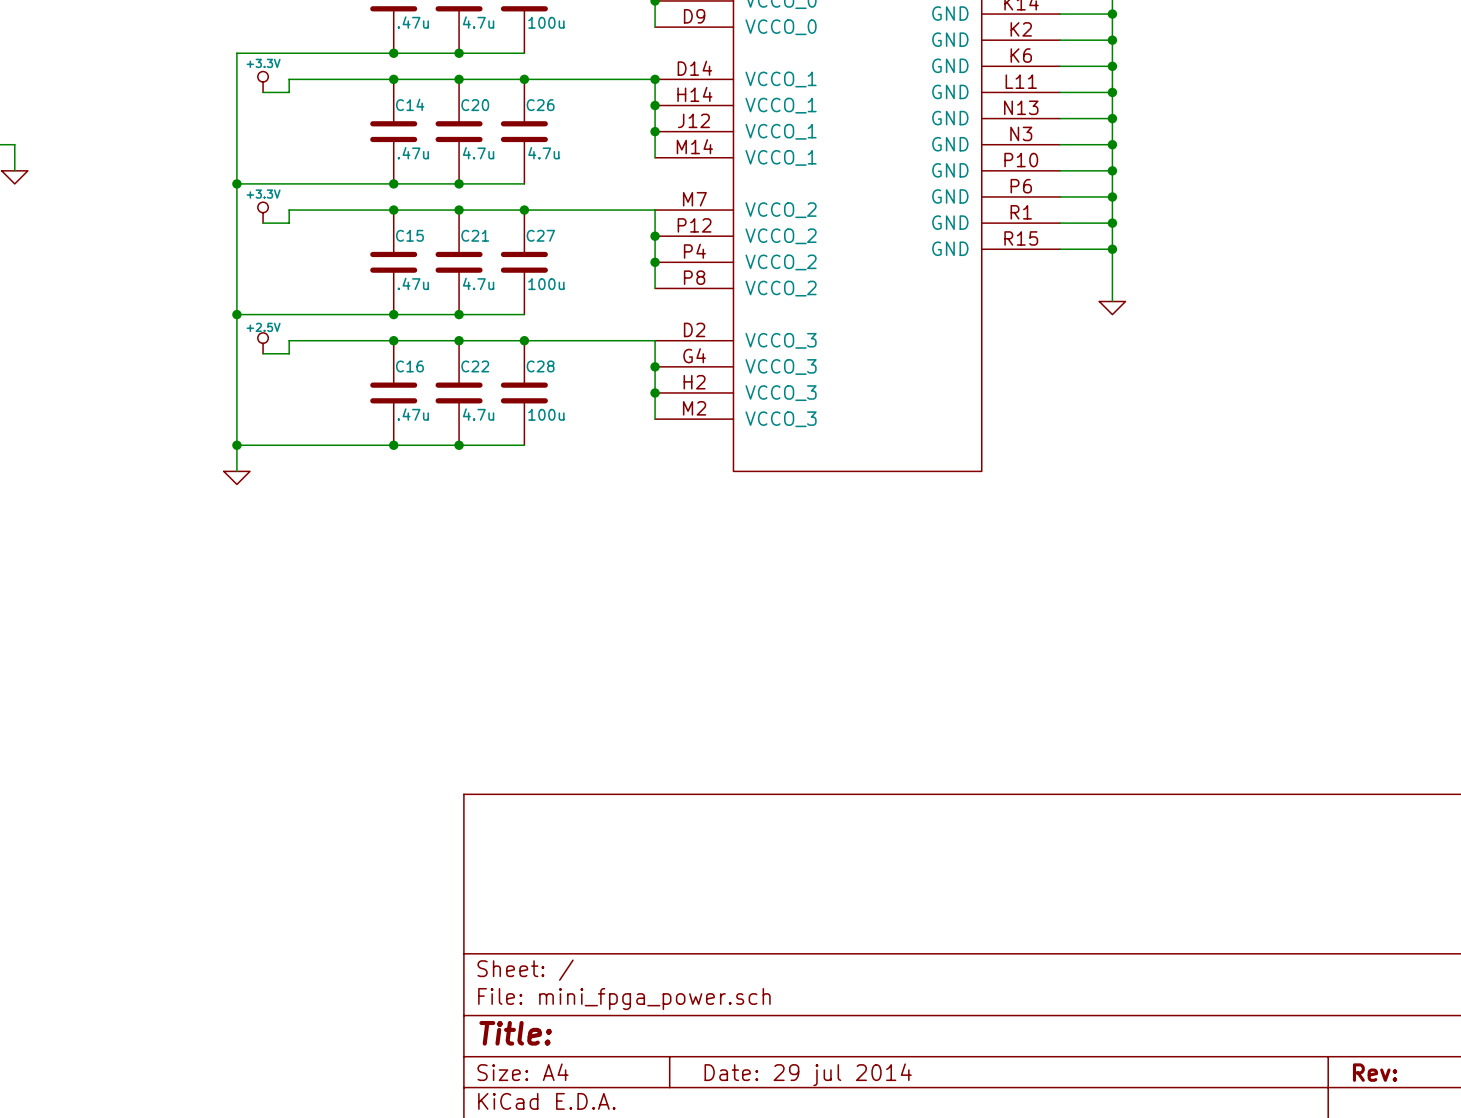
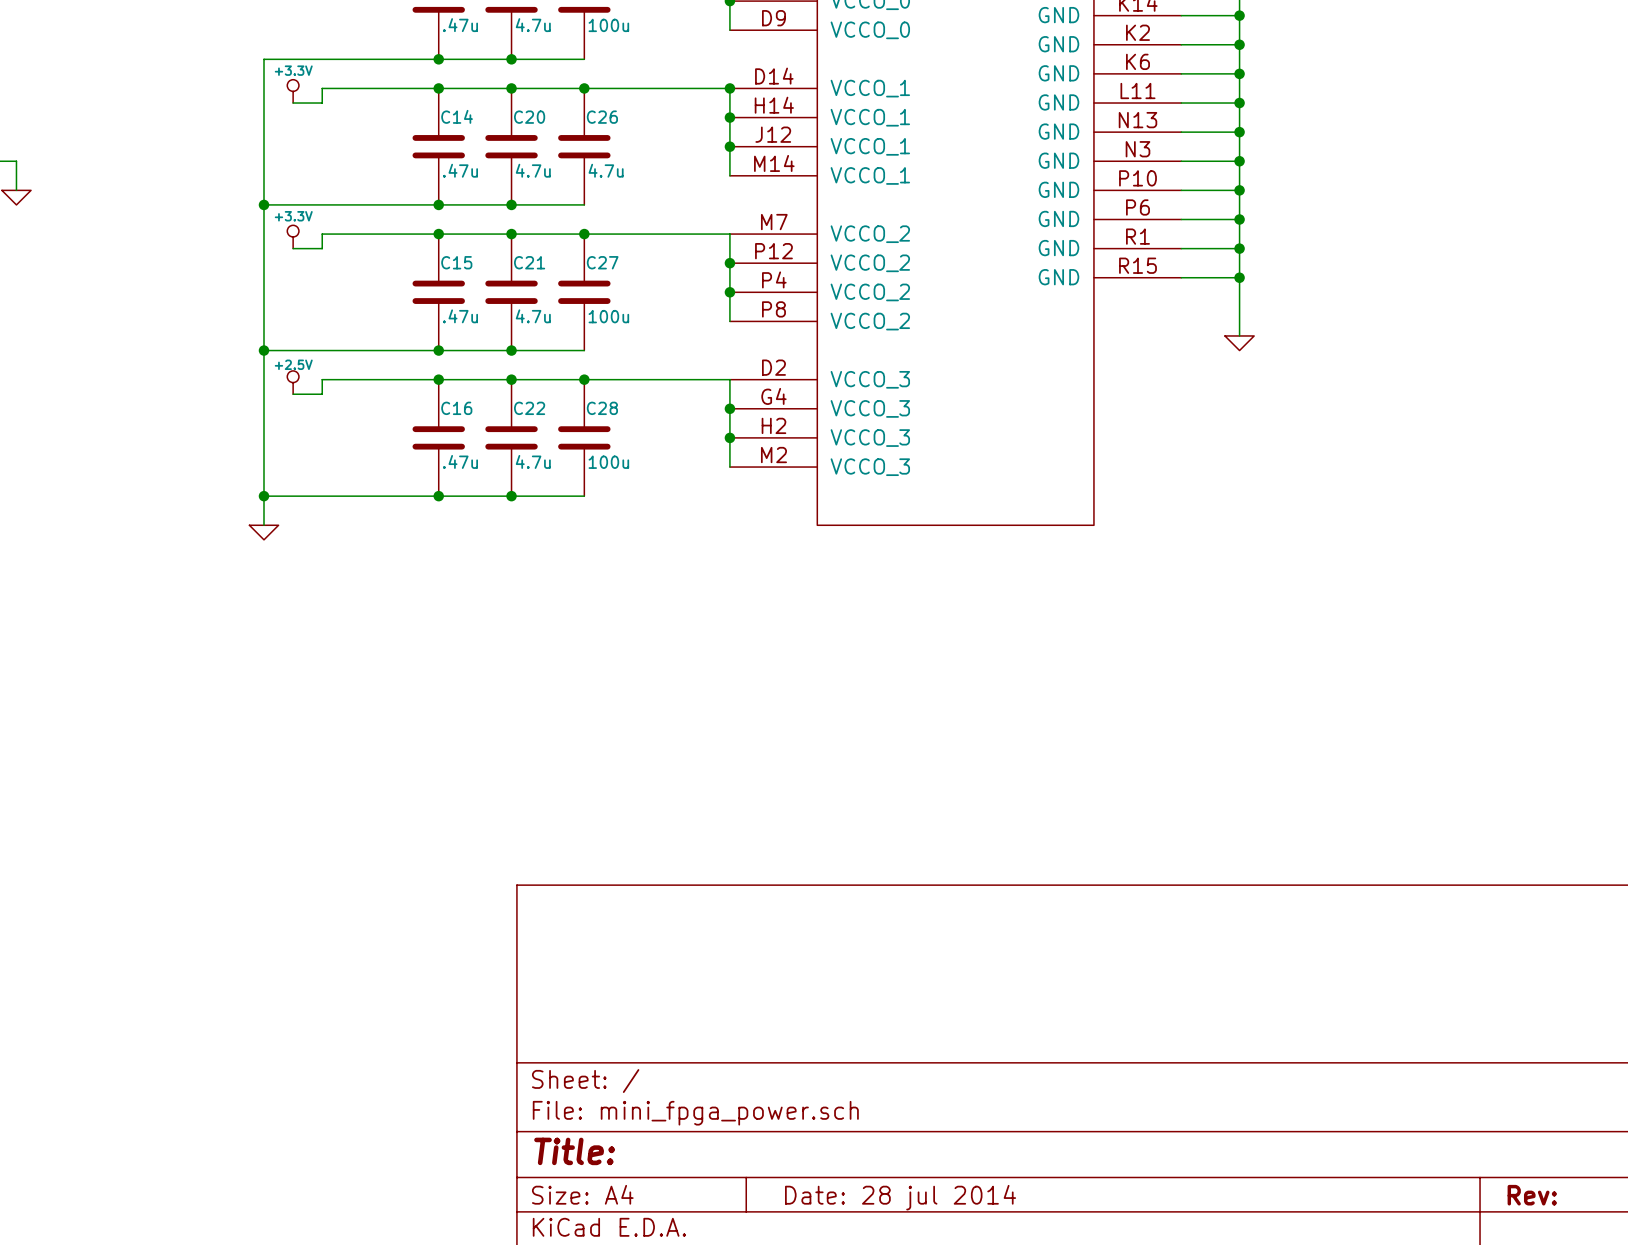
title block: Date: 29 jul 2014 (808, 1074) -> Date: 28 jul 2014 (900, 1197)

